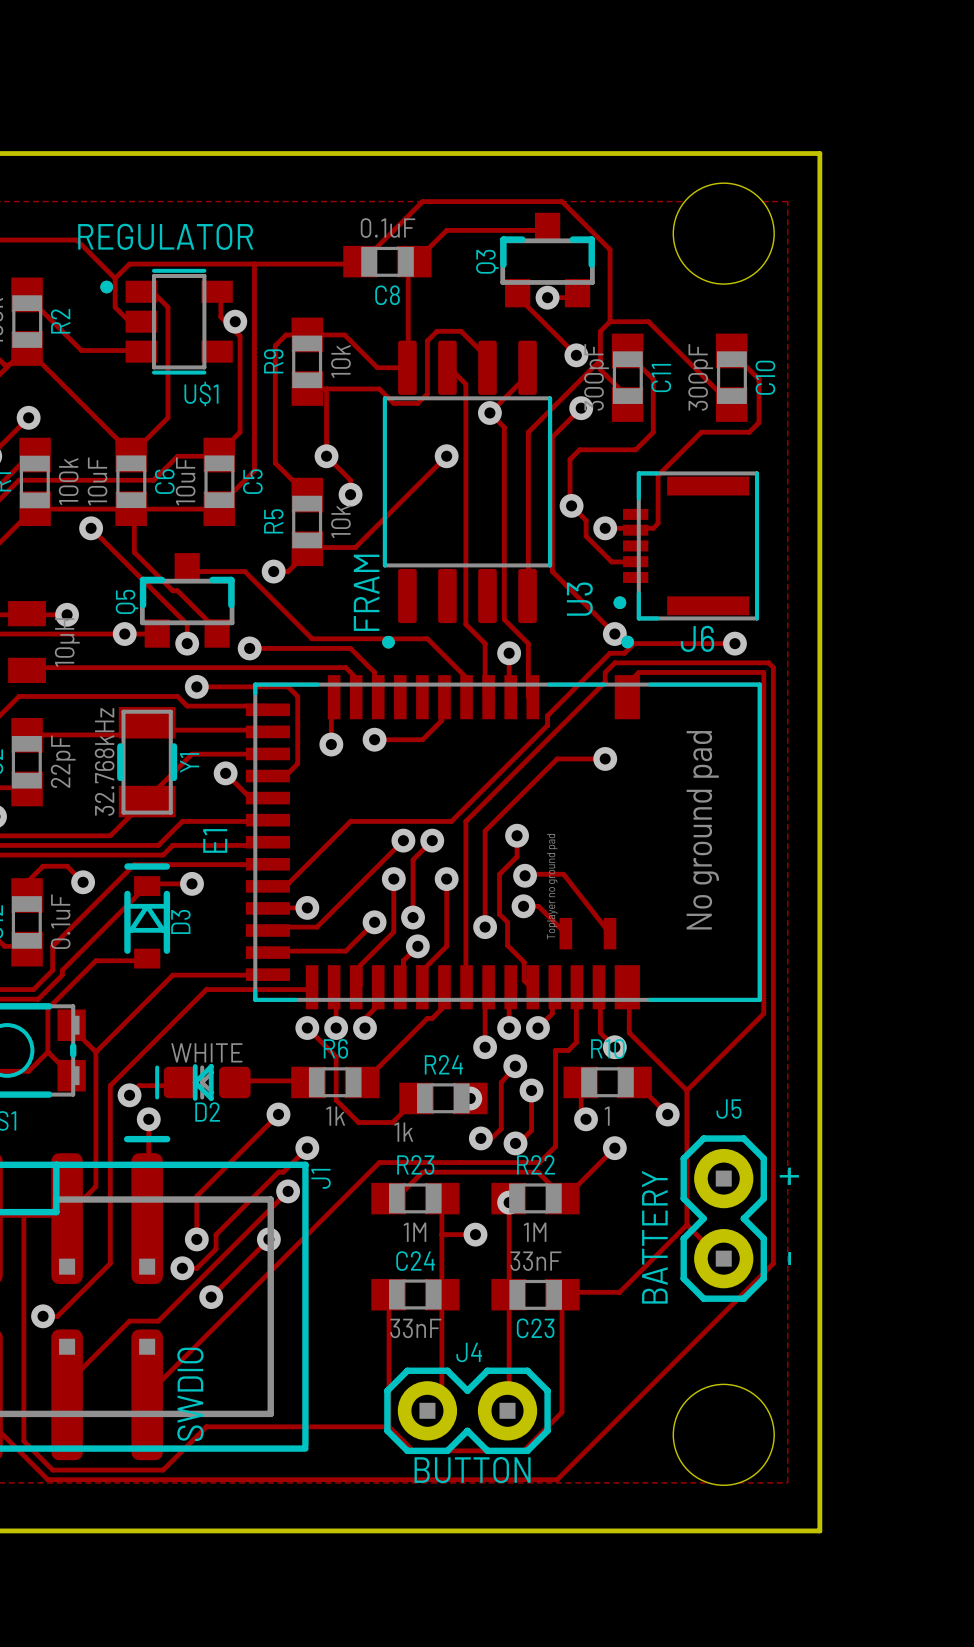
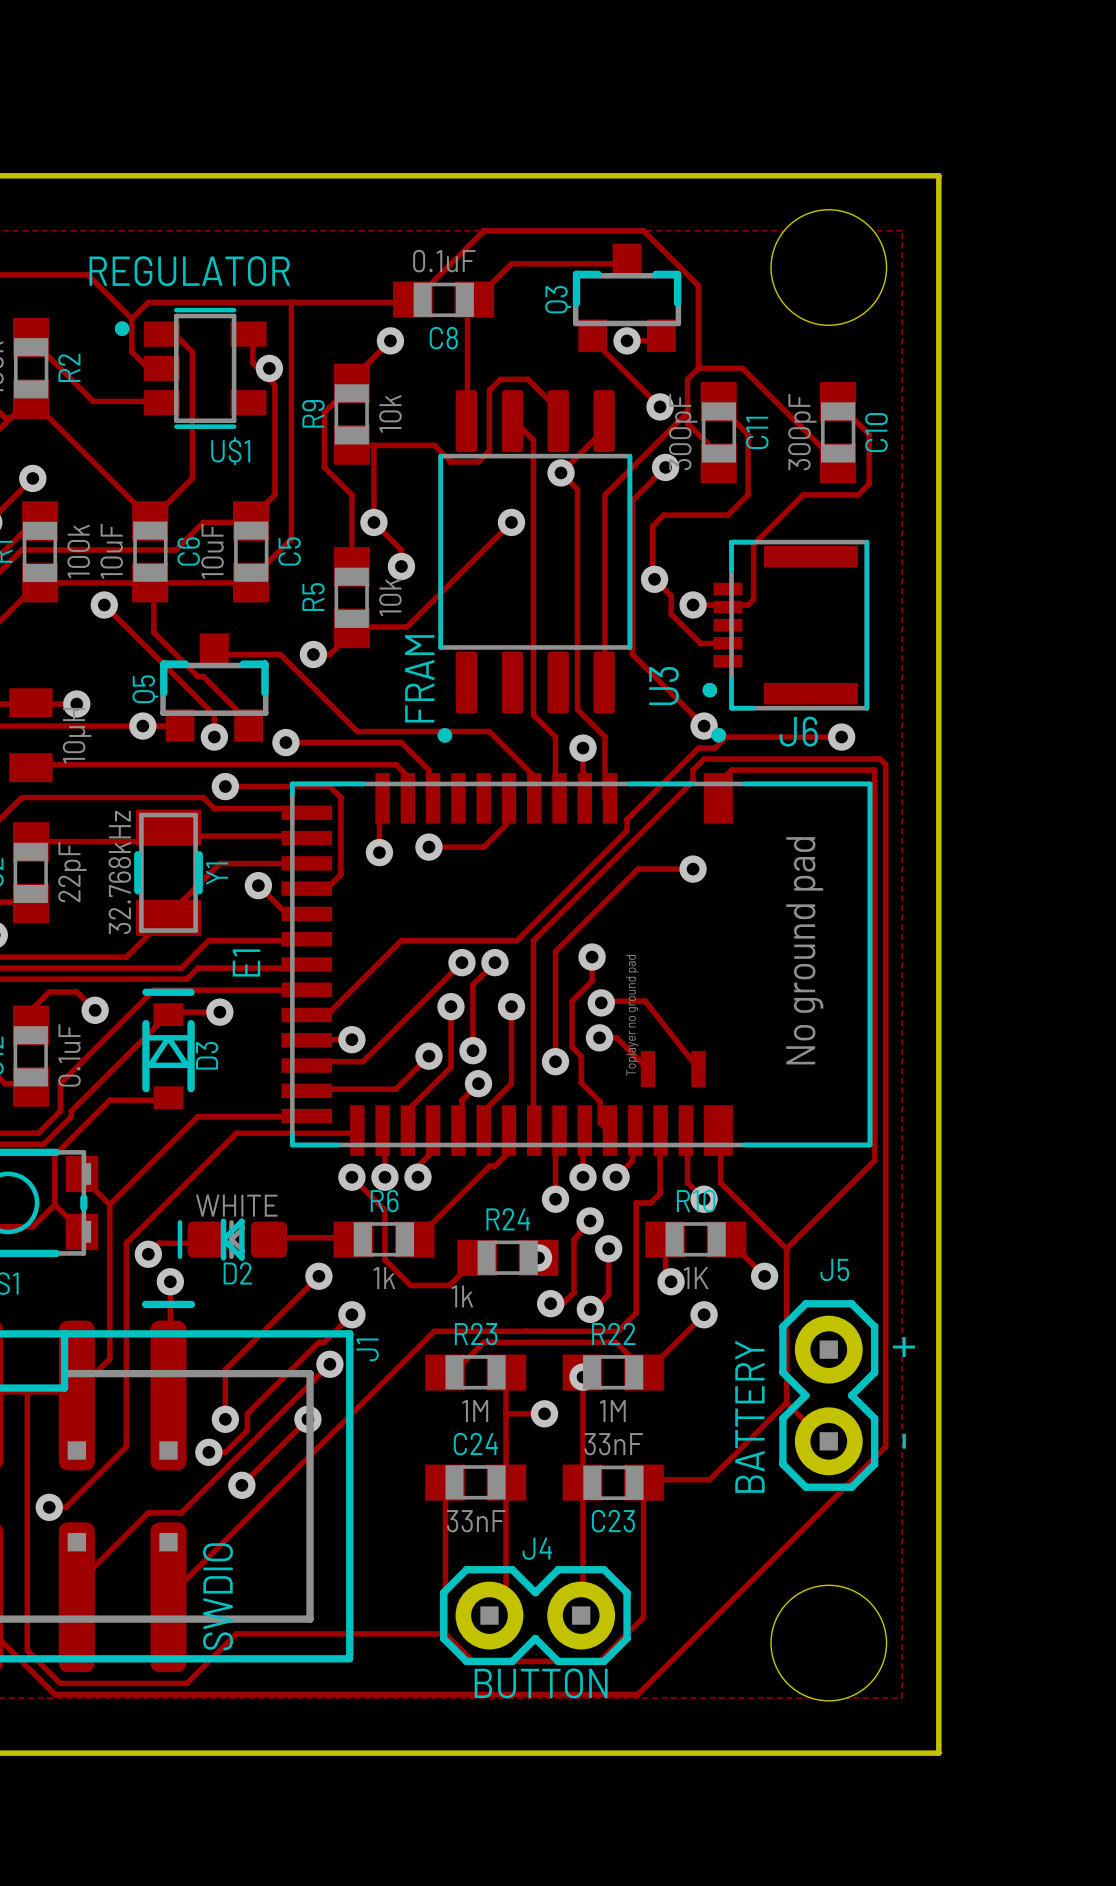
via: none -> (390, 340)
track: (407, 367) (377, 367) (344, 334) (286, 334) (275, 345) (275, 463) (307, 495) -> (390, 340) (351, 379) (351, 384) (324, 412) (324, 467) (351, 494) (351, 566)
R10 value: 1 (607, 1116) -> 1K (696, 1278)

